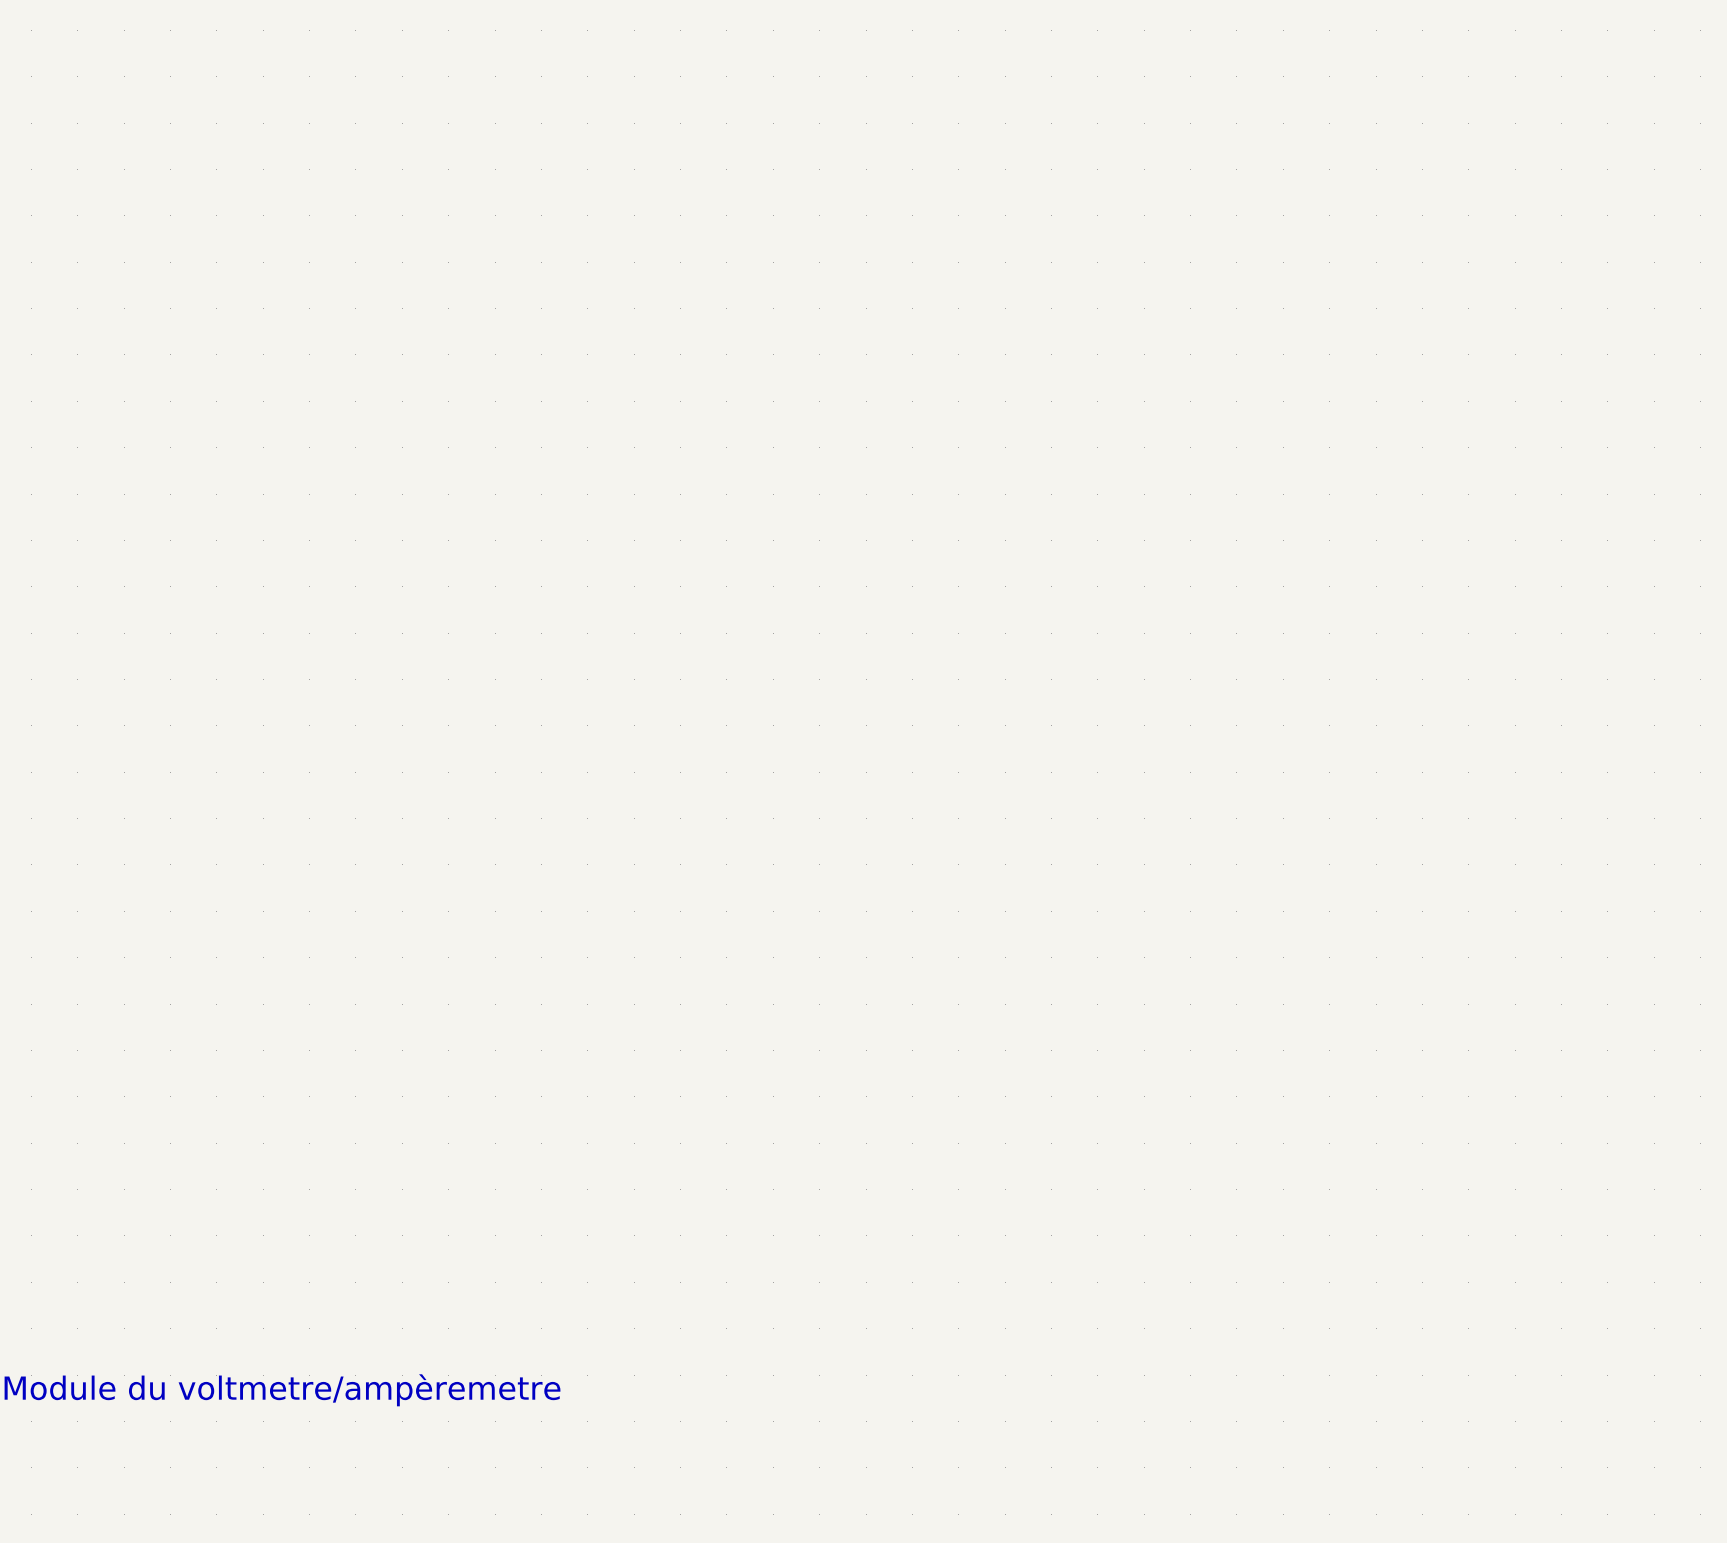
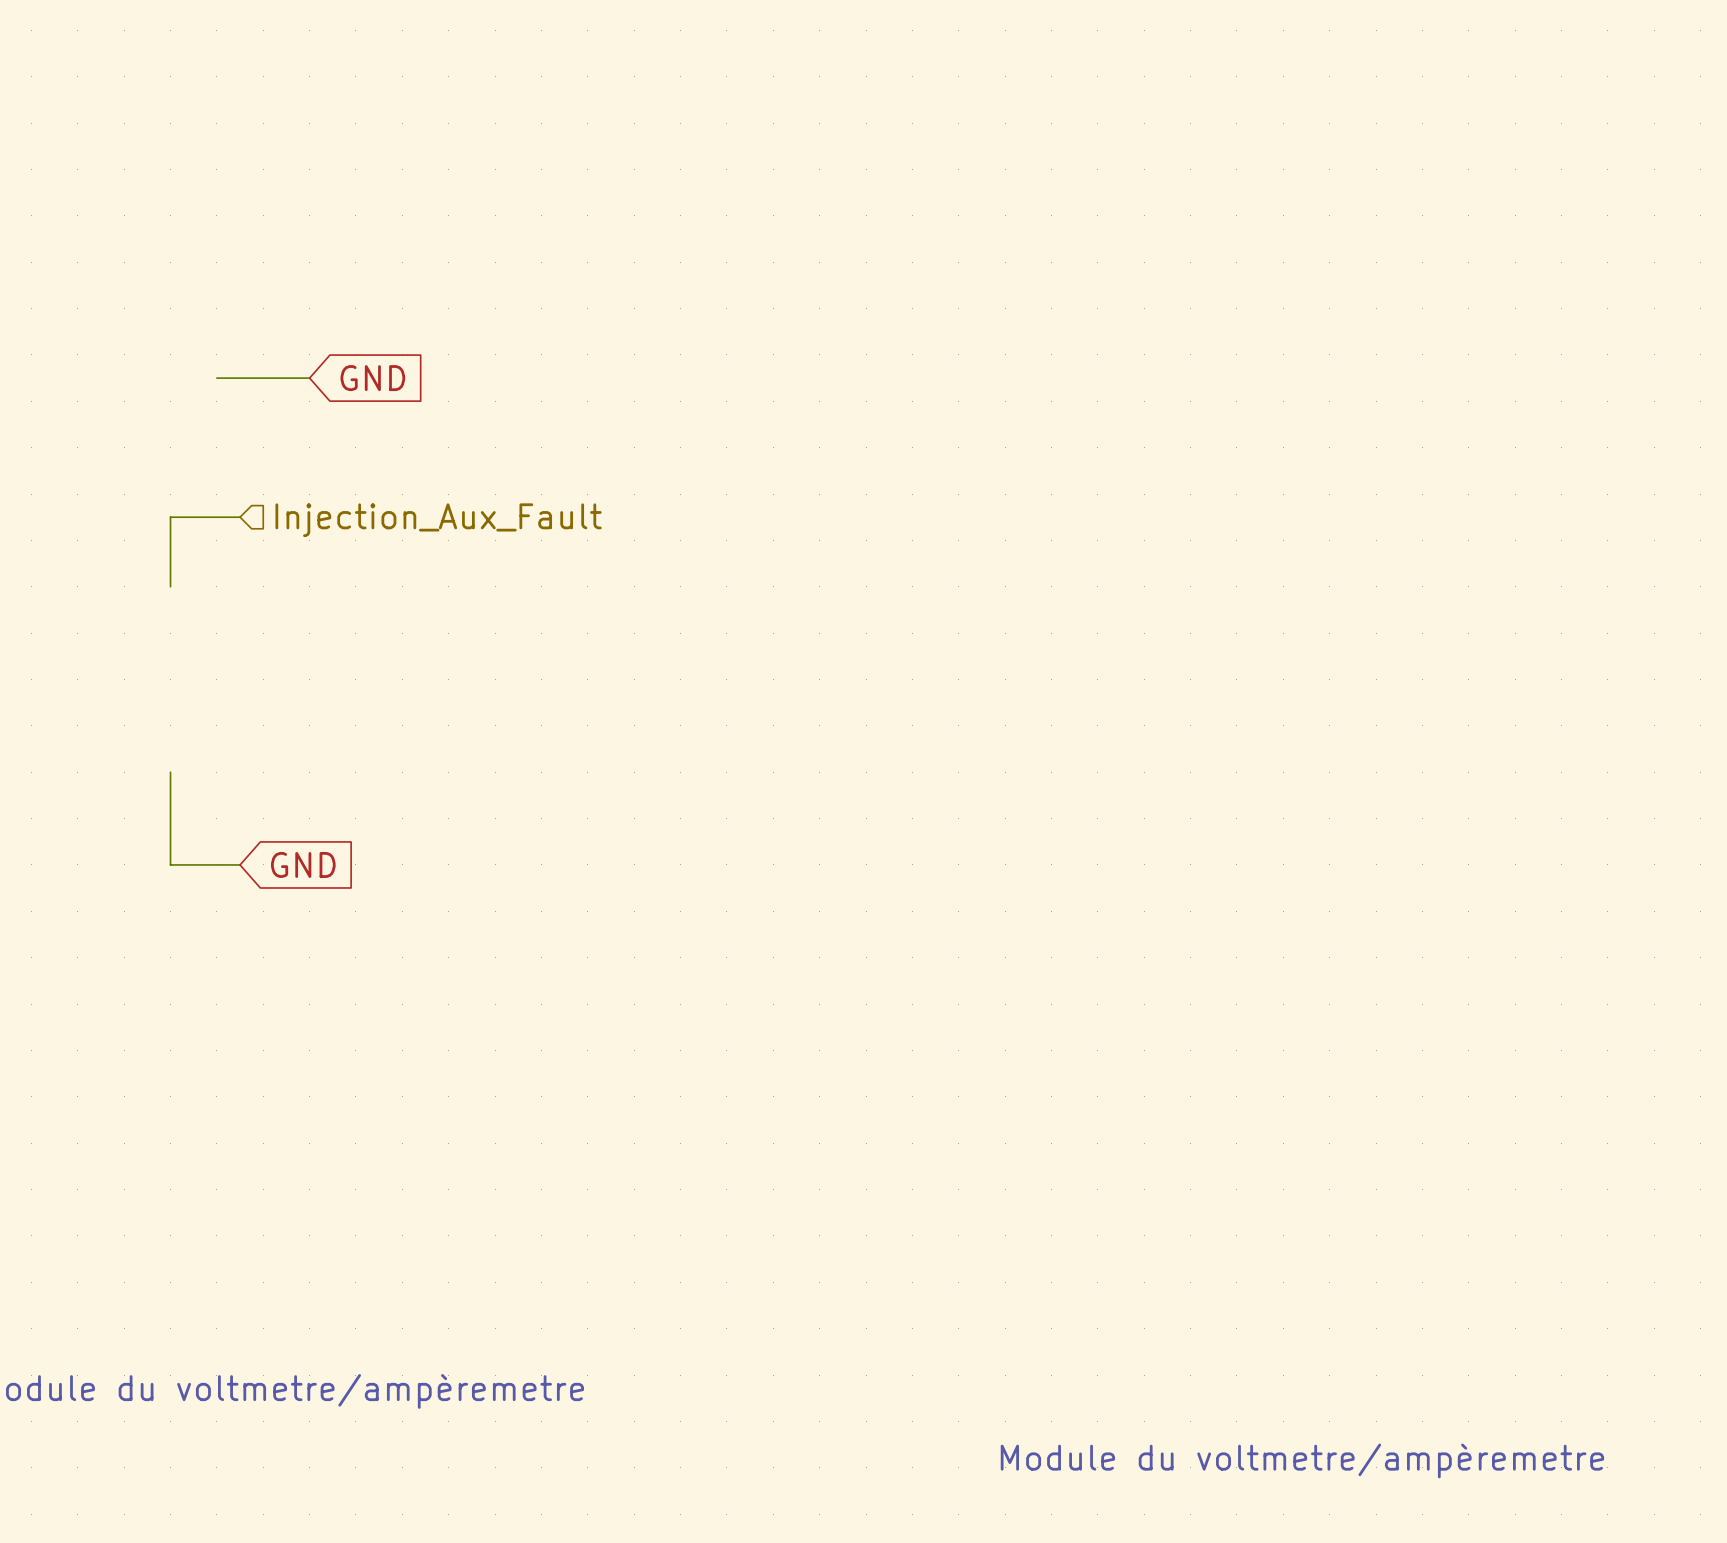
wire: none -> (216, 378) (309, 378)
global label: none -> GND (372, 378)
wire: none -> (240, 517) (170, 517) (170, 586)
hierarchical label: none -> Injection_Aux_Fault (438, 520)
wire: none -> (170, 772) (170, 864) (240, 864)
global label: none -> GND (303, 864)
text: none -> Module du voltmetre/ampèremetre (1302, 1460)

